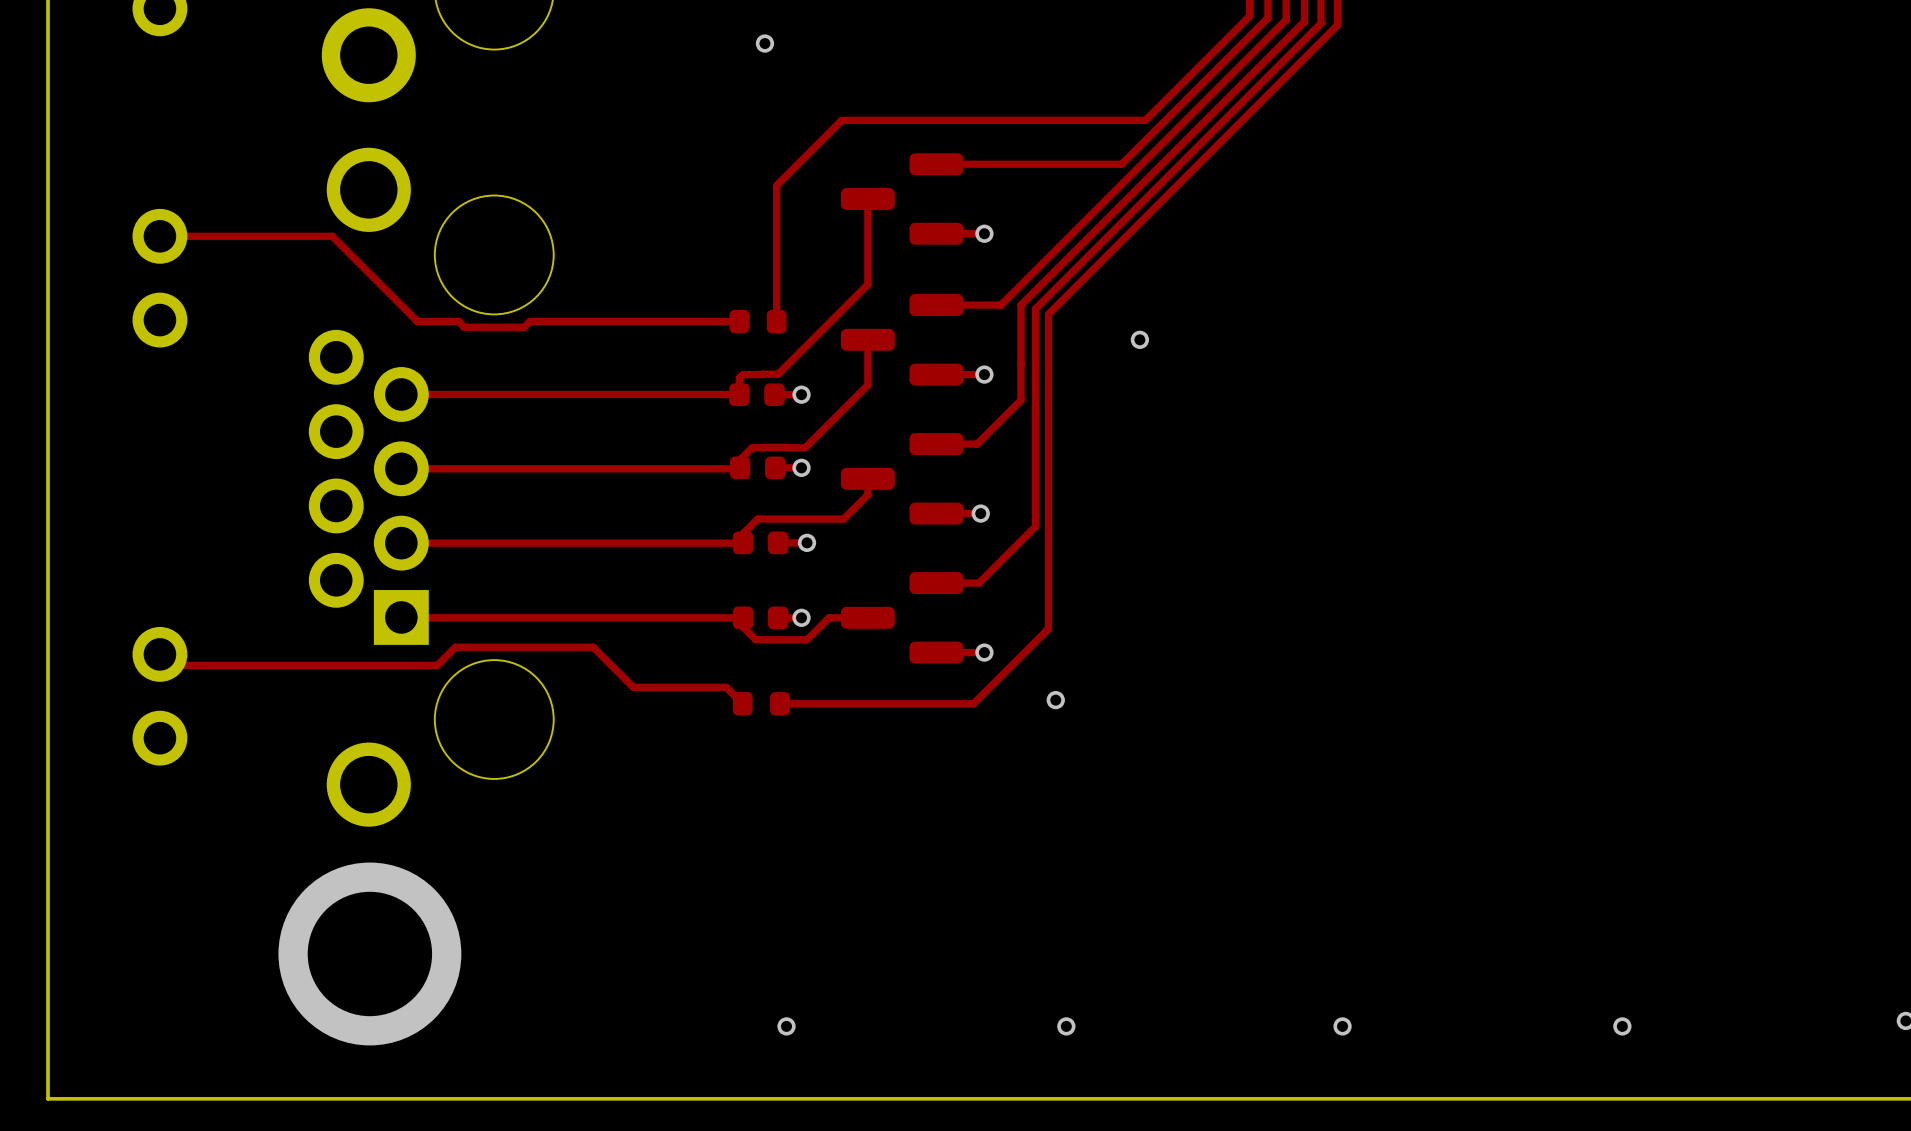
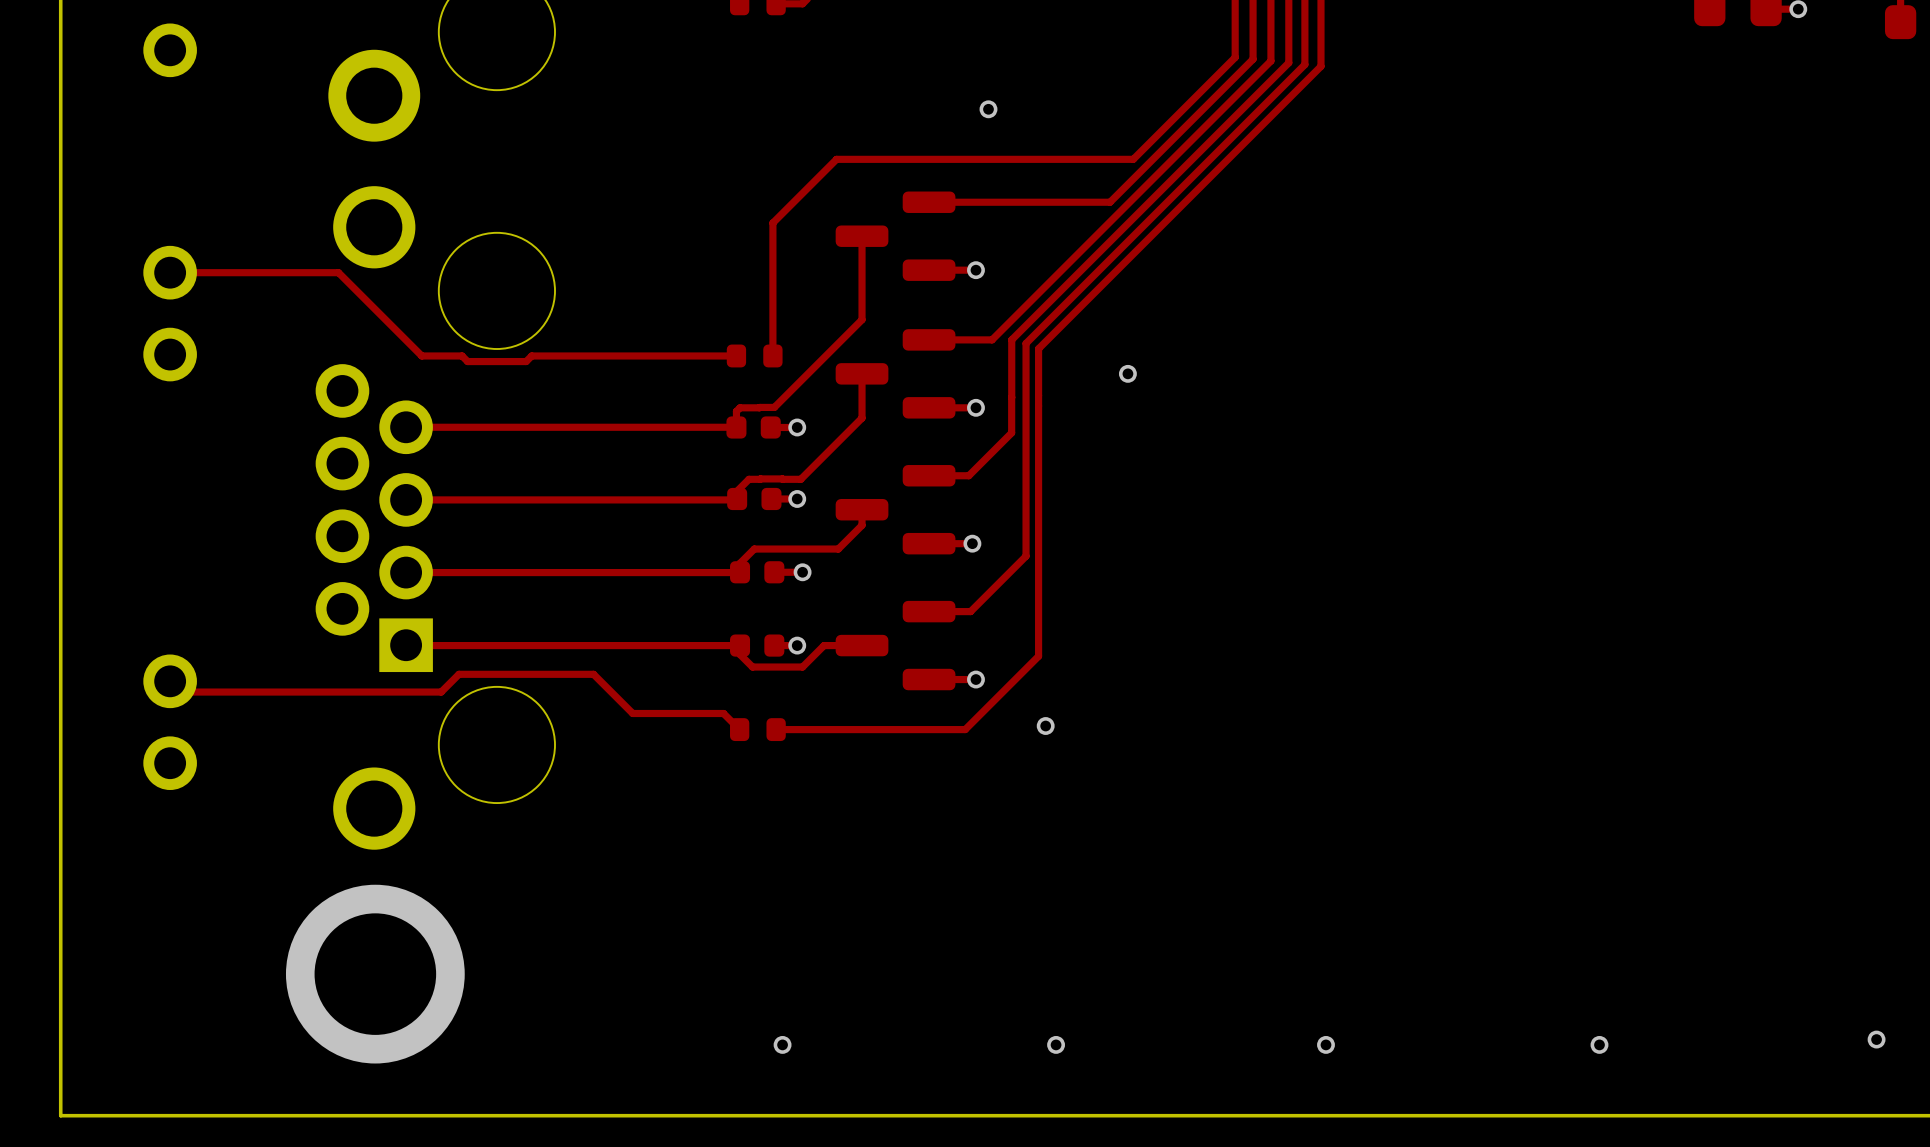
via: (764, 43) -> none
via: none -> (988, 109)

